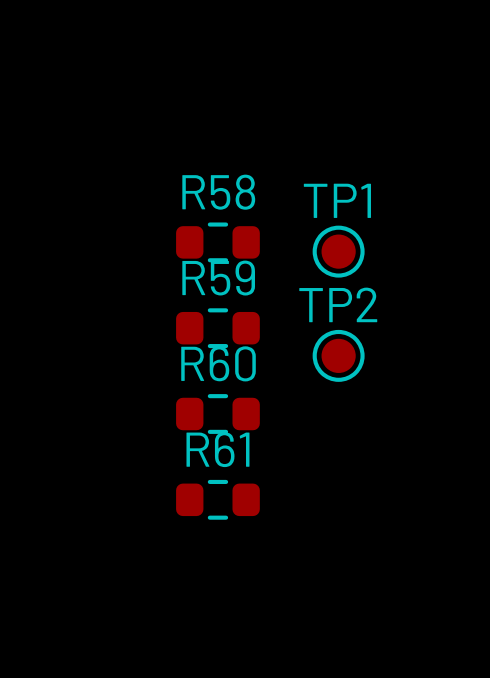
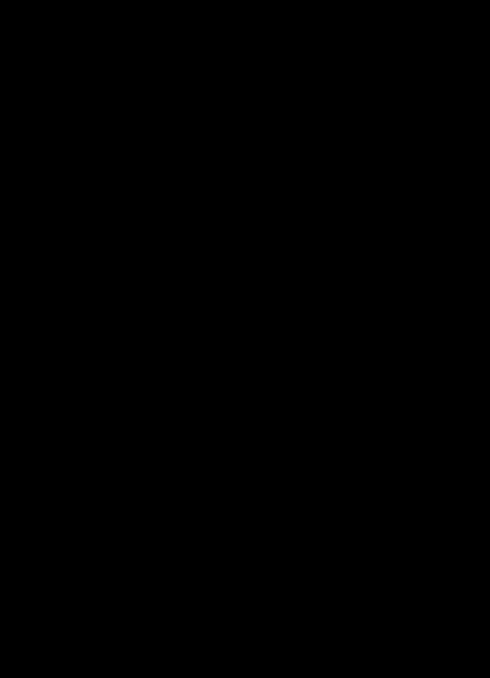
R58: (217, 242) -> none
TP1: (338, 251) -> none
R59: (217, 328) -> none
TP2: (338, 355) -> none
R60: (217, 414) -> none
R61: (217, 499) -> none

